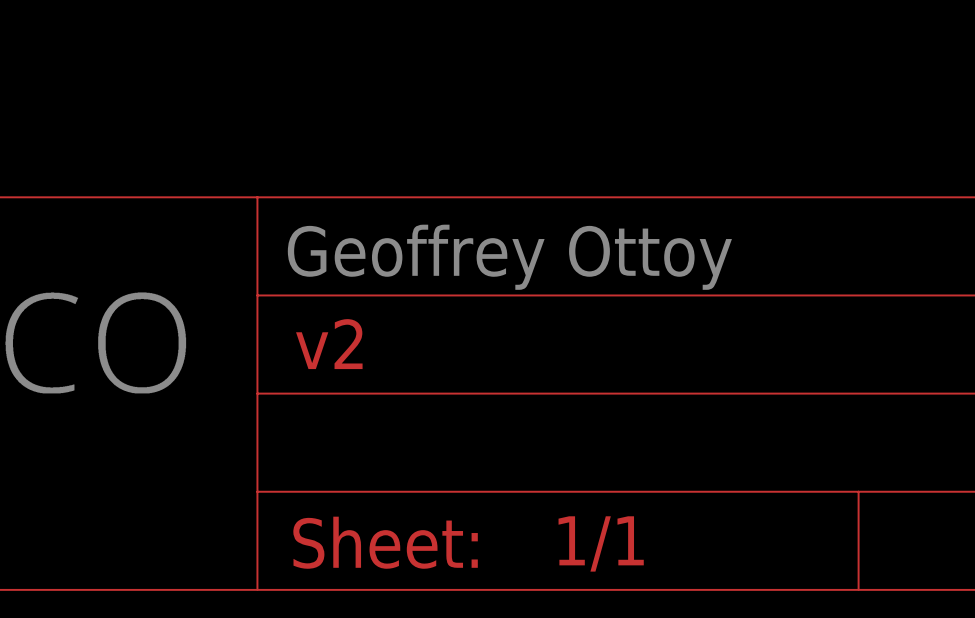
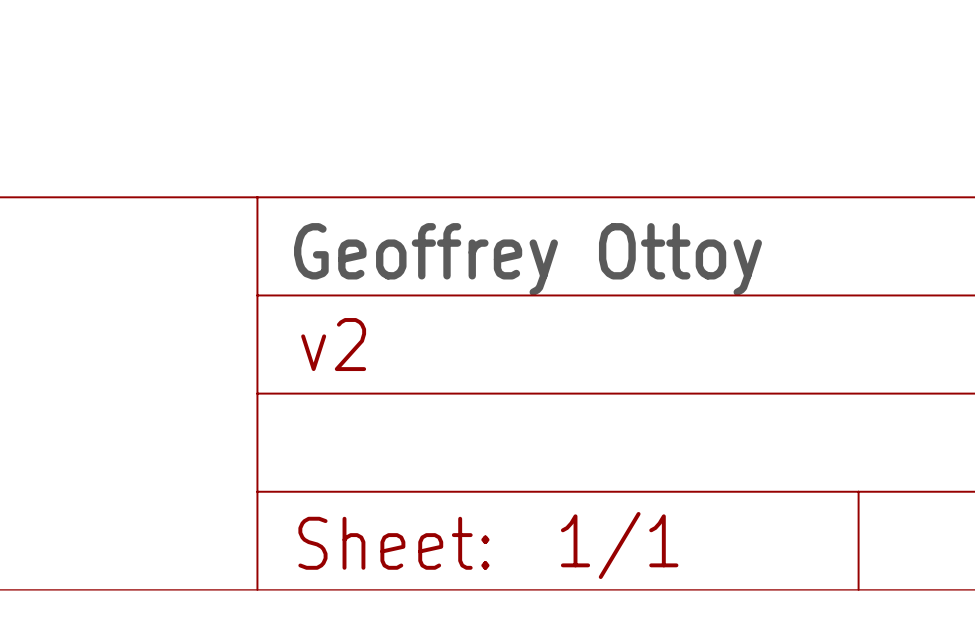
drawing: [5, 292, 79, 394] -> none
drawing: [98, 292, 187, 394] -> none

